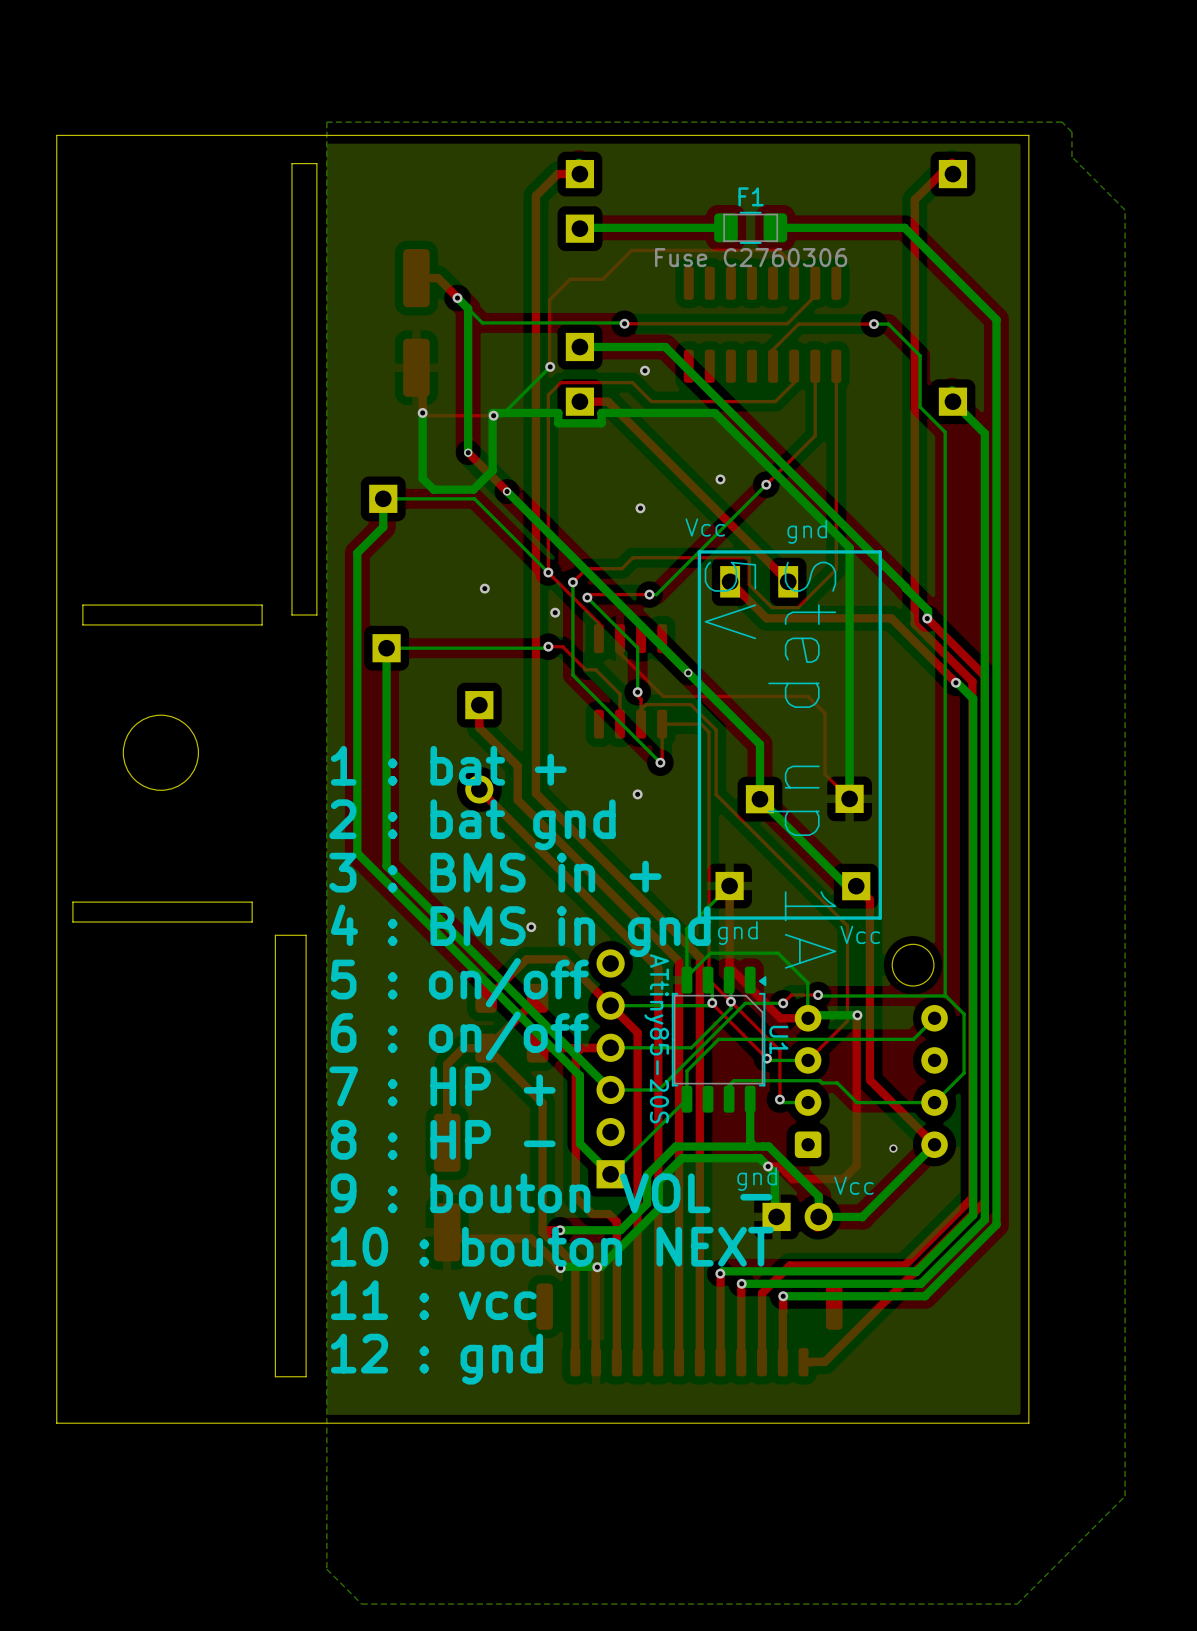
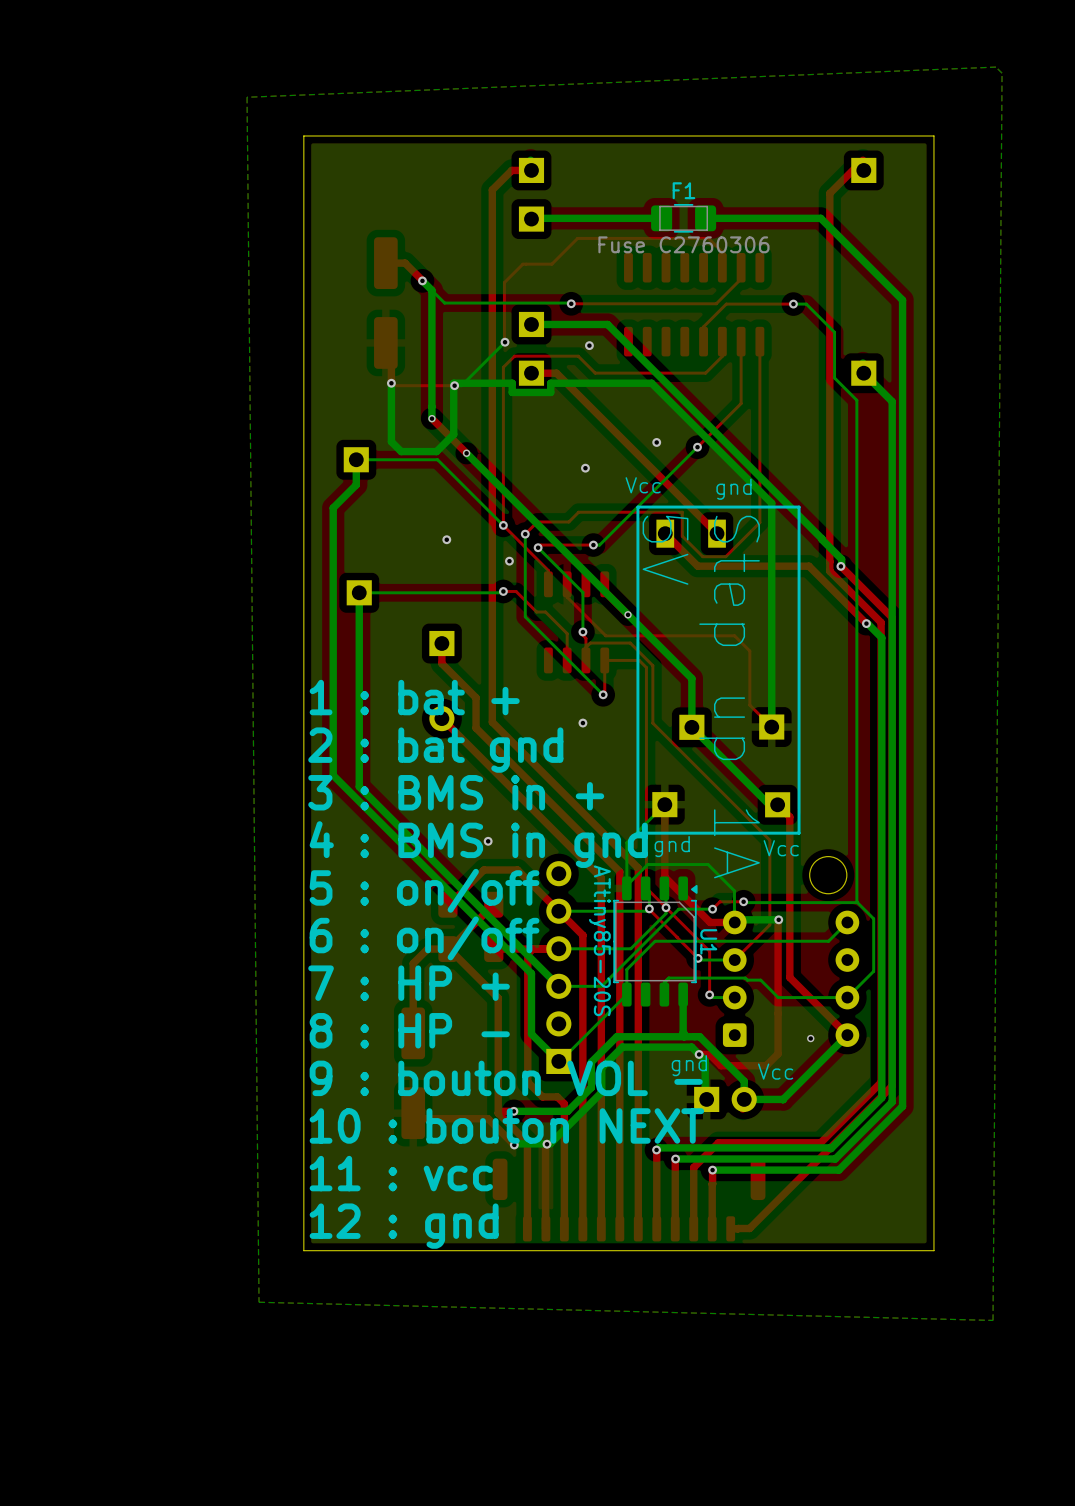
bottom zone outline: (1062, 122) (326, 122) (326, 1569) (361, 1604) (1017, 1604) (1125, 1496) (1125, 210) (1071, 156) (1071, 132) (1062, 122) -> (995, 67) (1002, 73) (993, 1320) (259, 1302) (247, 97) (995, 67)
board edge: (1028, 135) (1028, 1423) (56, 1423) (56, 135) (324, 135) -> (931, 135) (933, 135) (933, 1250) (303, 1250) (303, 135)
board edge: (316, 163) (291, 163) (291, 615) (316, 615) (316, 163) -> none
board edge: (262, 605) (82, 605) (82, 624) (262, 624) (262, 605) -> none
round board edge: [122, 714, 199, 791] -> none
board edge: (252, 902) (72, 902) (72, 922) (252, 922) (252, 902) -> none
board edge: (306, 935) (275, 935) (275, 1376) (306, 1376) (306, 935) -> none

